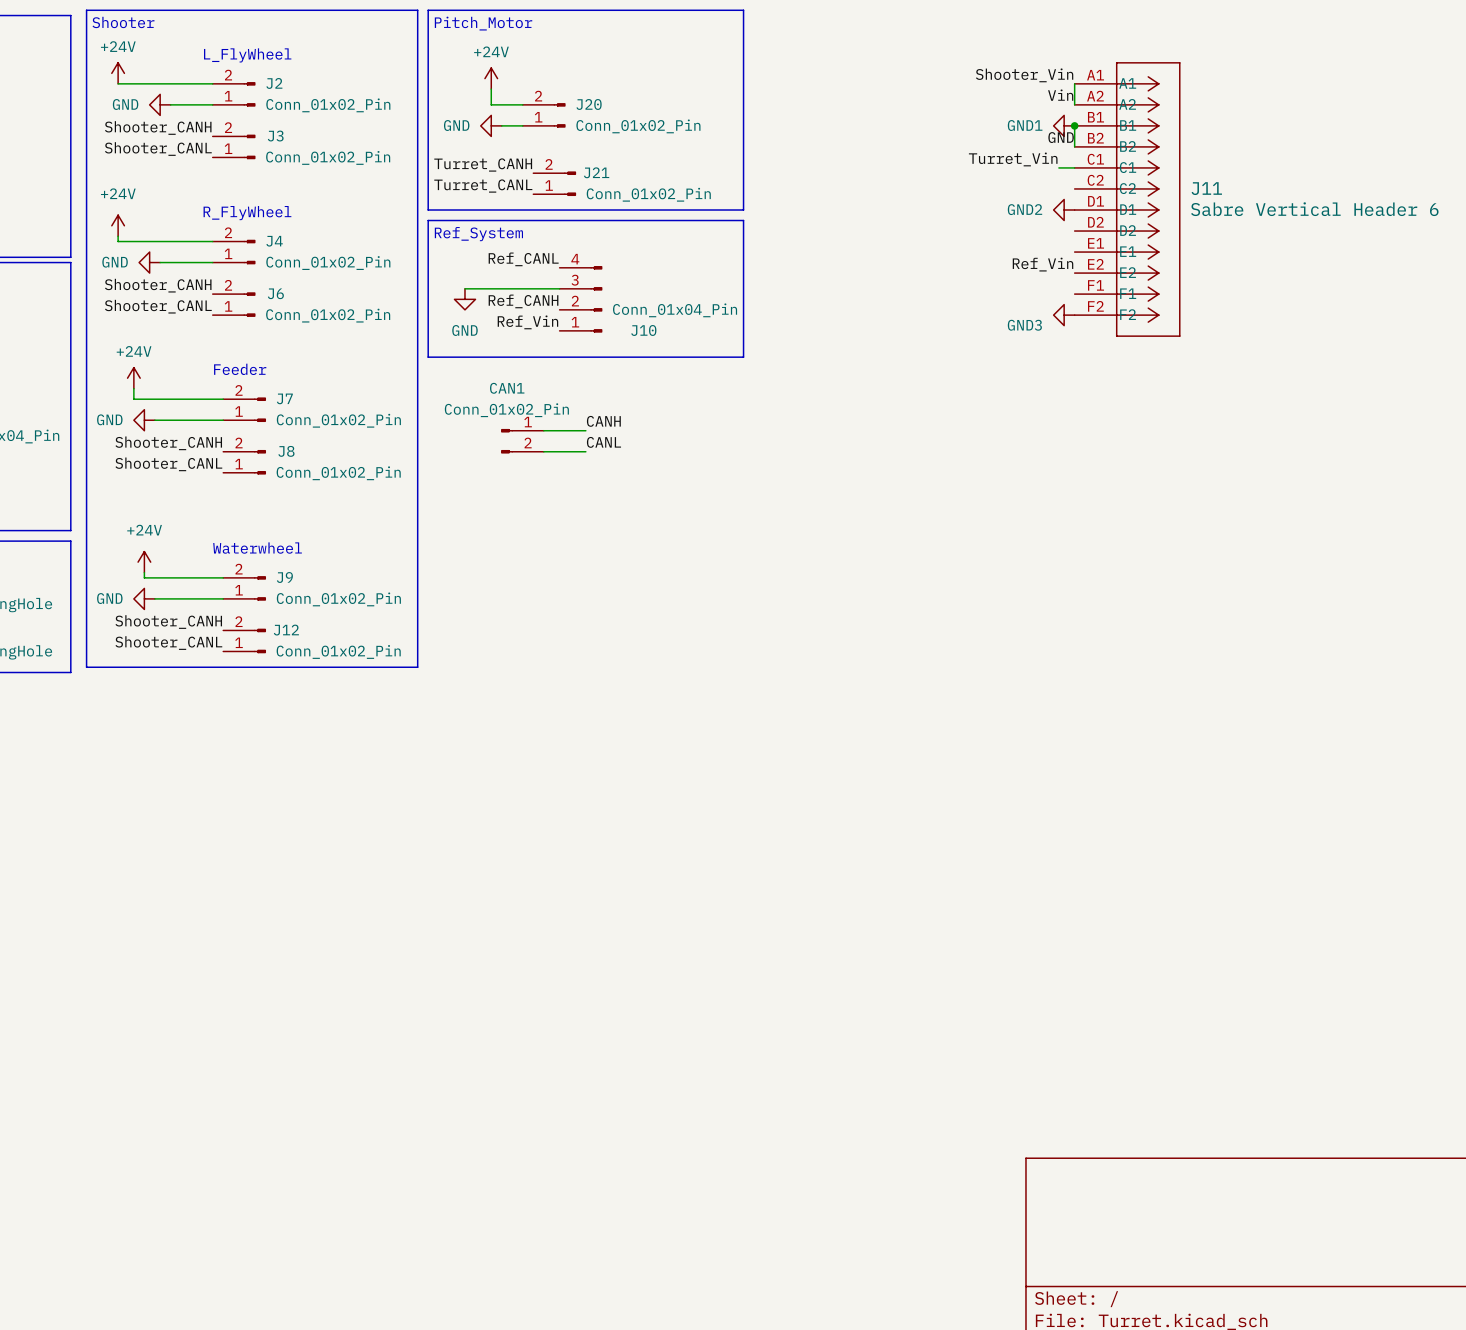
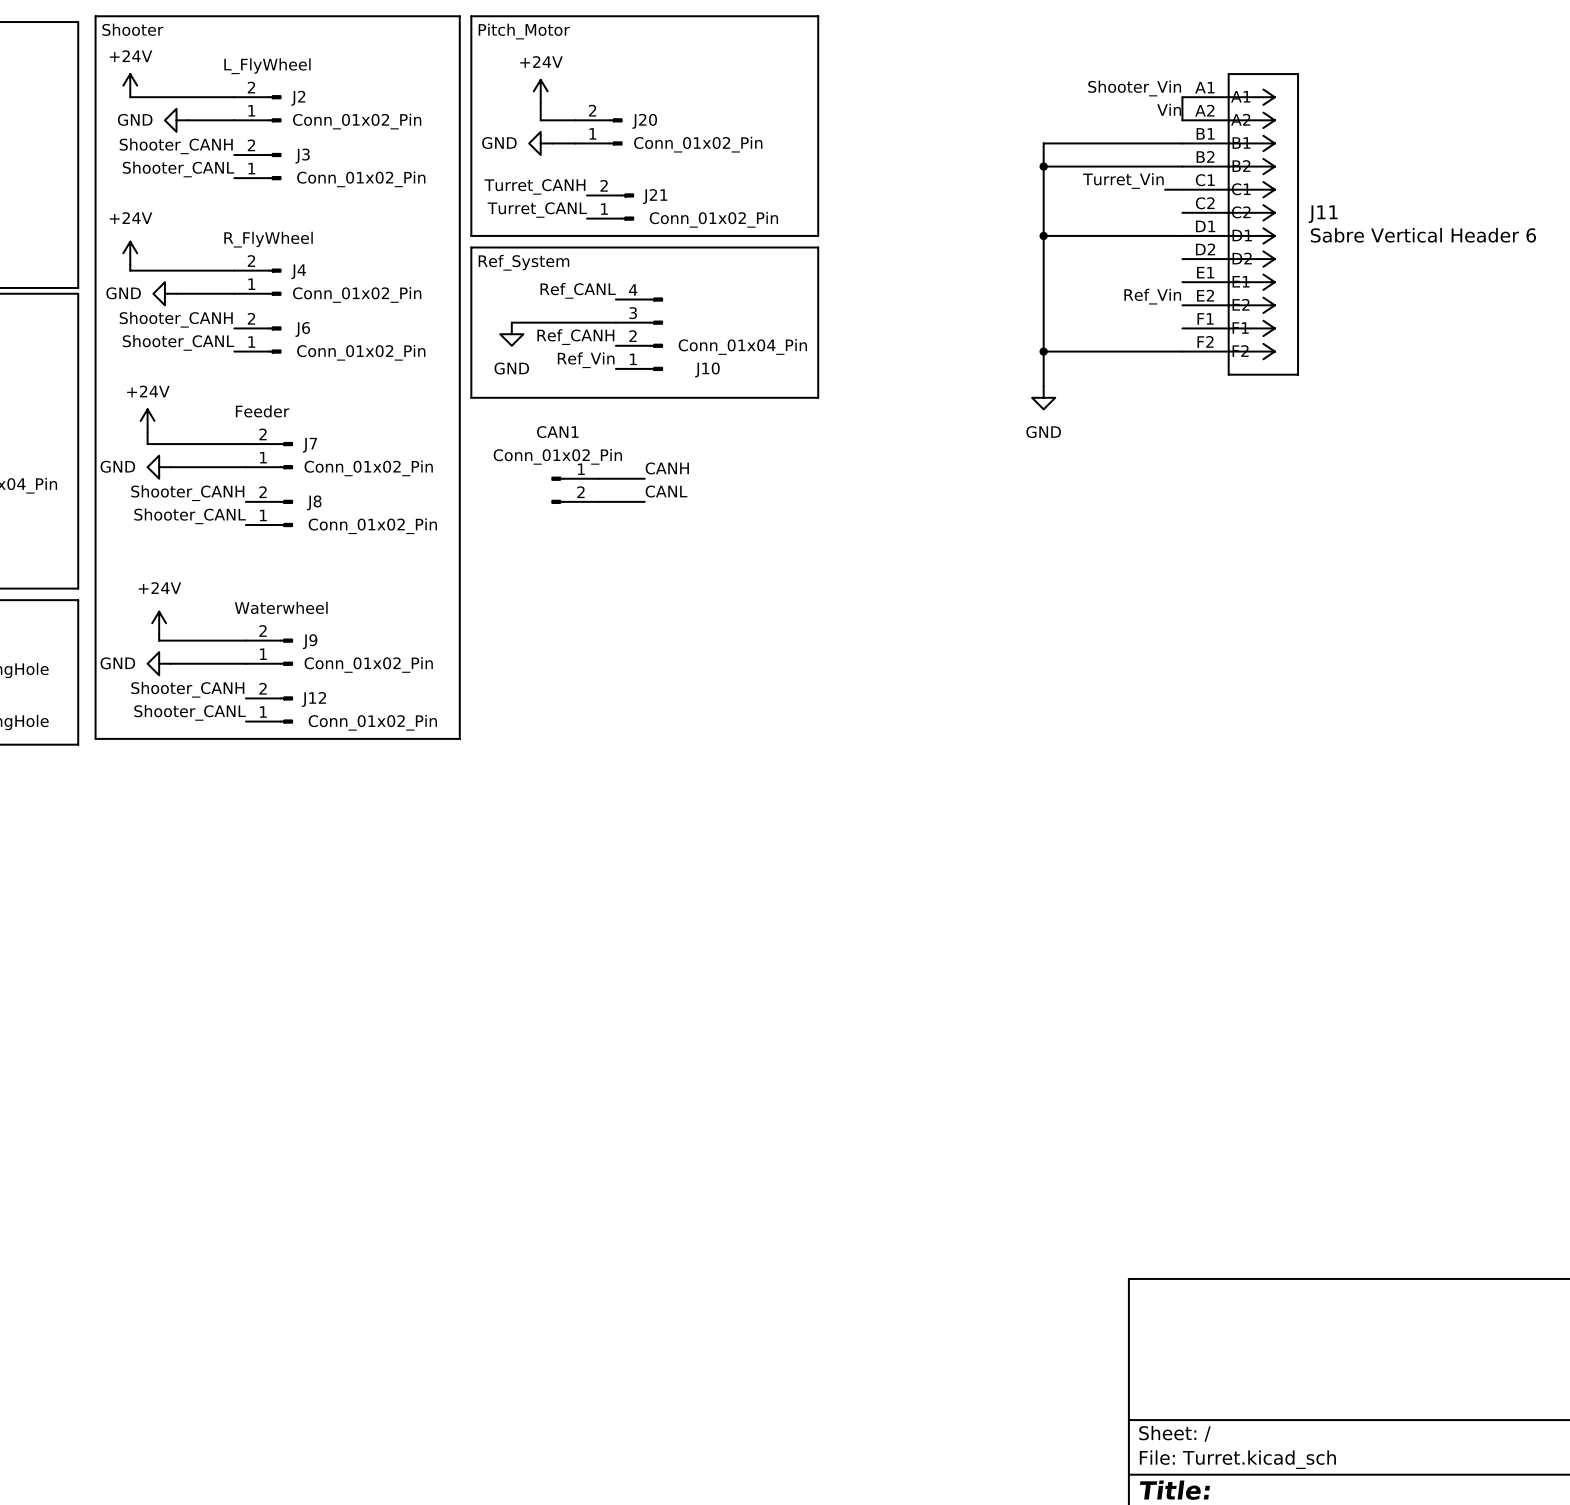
power symbol: GND1 (1064, 125) -> none
wire: (1074, 125) (1074, 146) -> (1043, 166) (1182, 166)
wire: none -> (1182, 143) (1043, 143) (1043, 386)
junction: (1074, 125) -> none
label: GND (1061, 137) -> none
junction: none -> (1043, 166)
wire: none -> (1043, 235) (1182, 235)
junction: none -> (1043, 235)
power symbol: GND2 (1064, 210) -> none
wire: none -> (1043, 351) (1182, 351)
junction: none -> (1043, 351)
power symbol: GND3 (1064, 315) -> none
power symbol: none -> GND (1043, 397)

